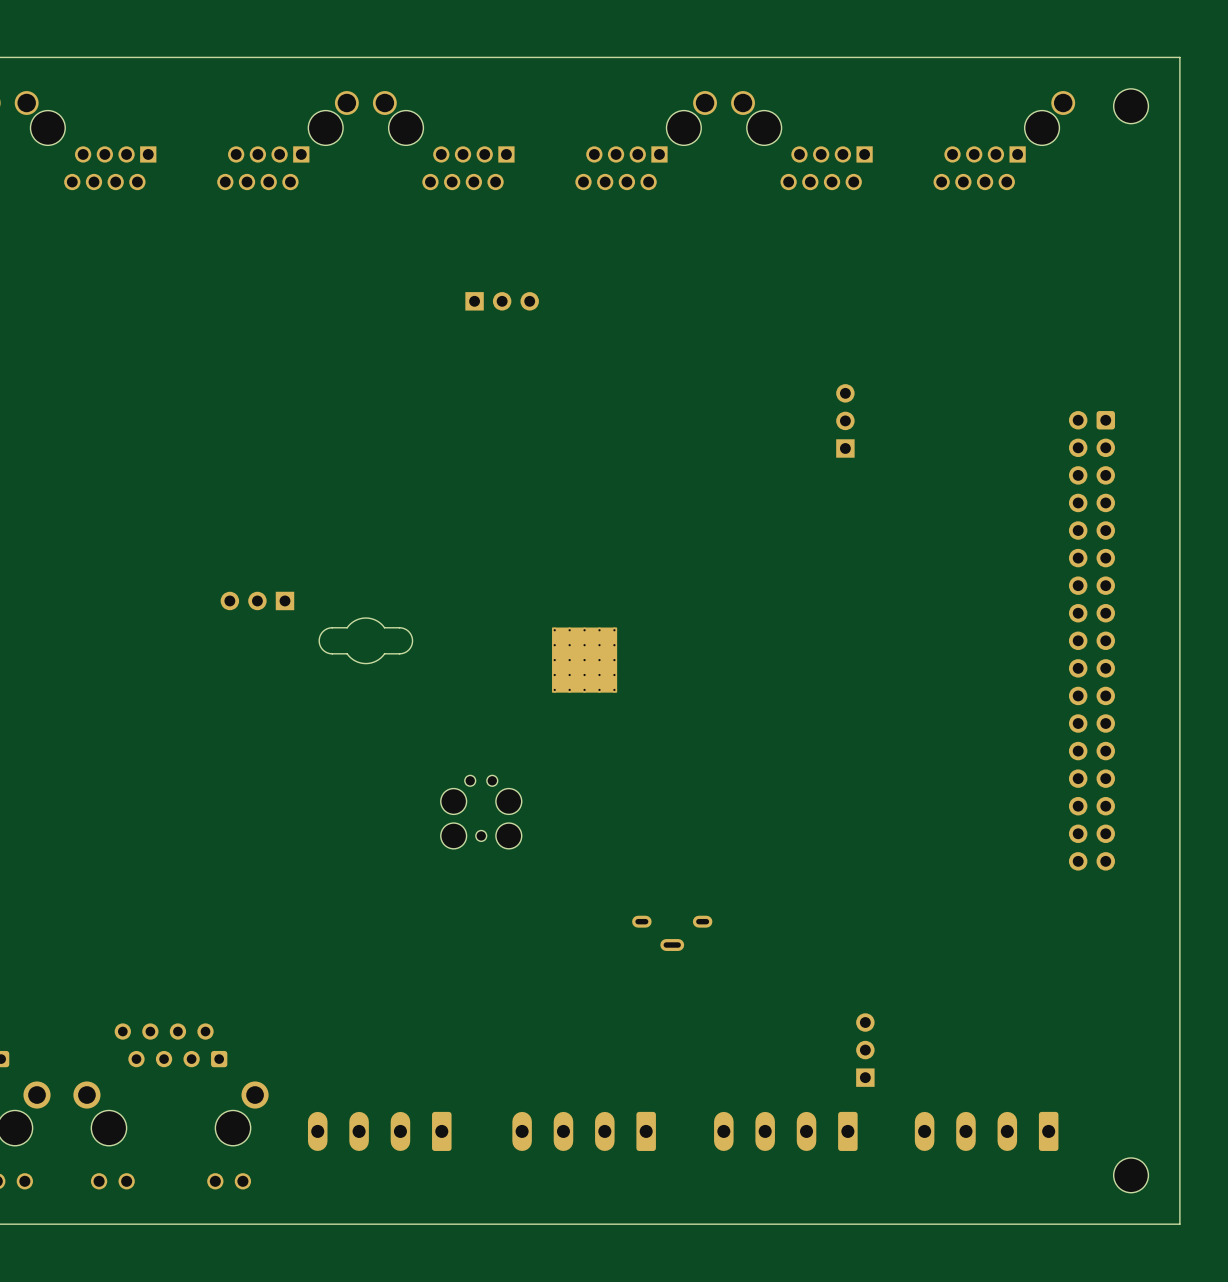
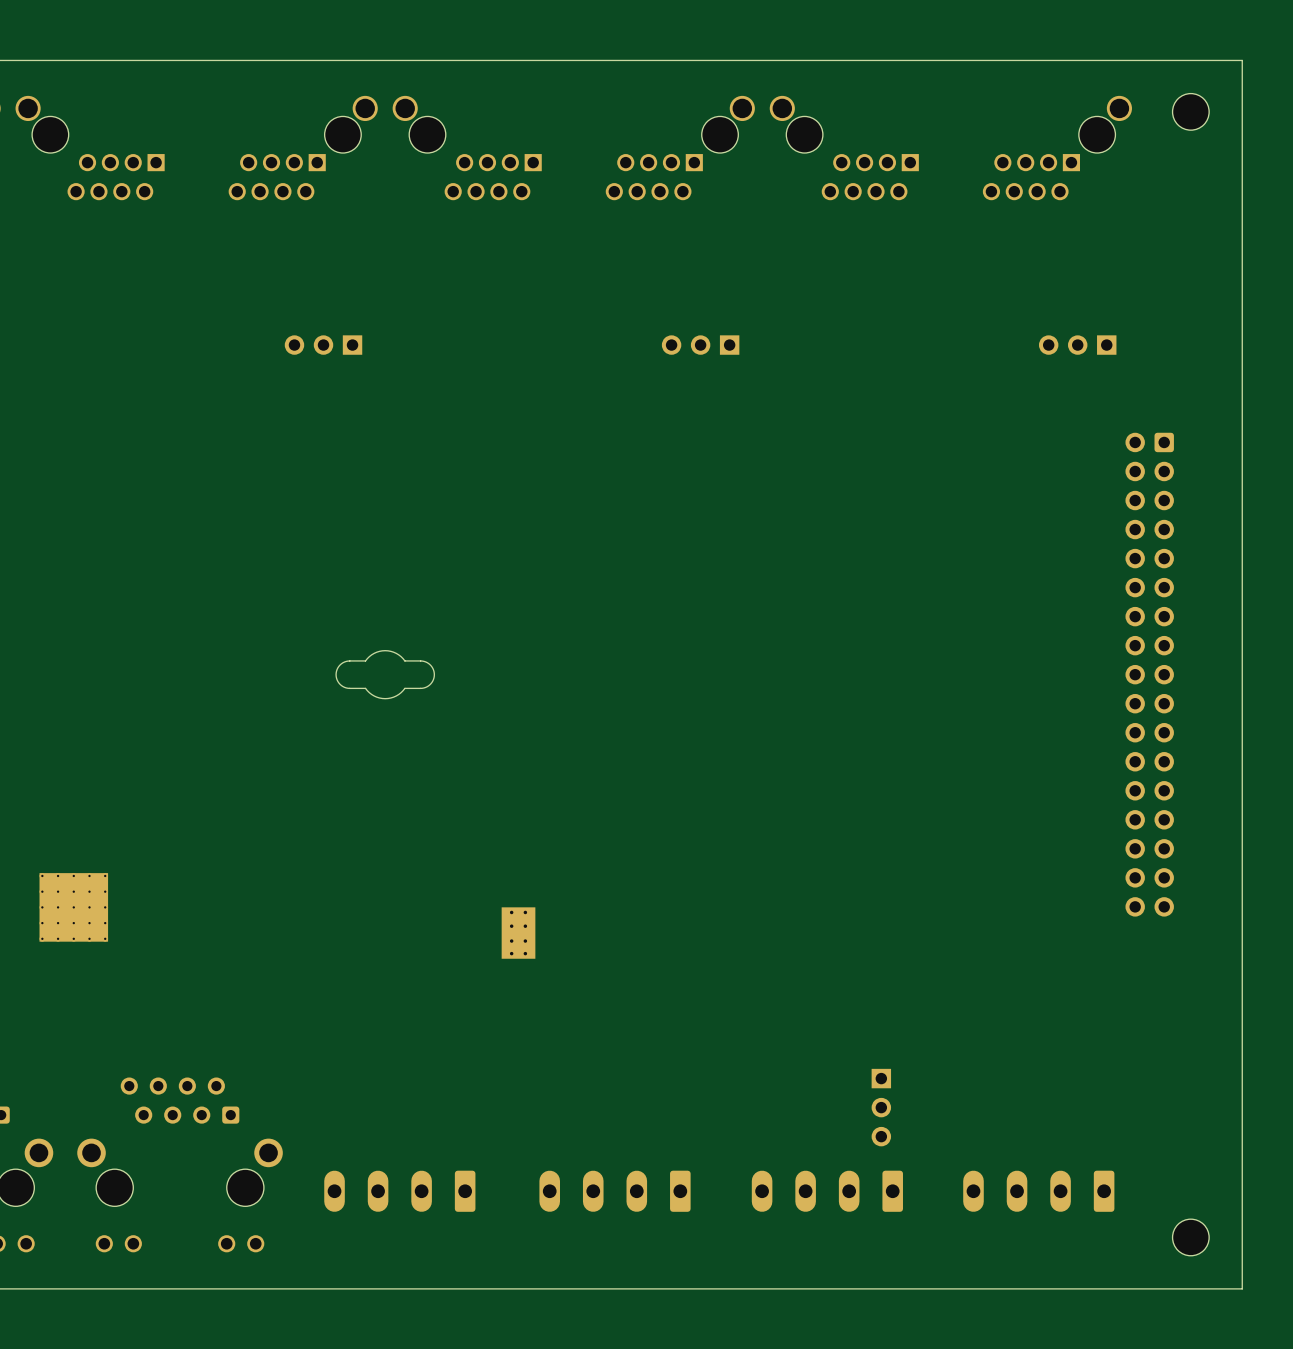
part: (502, 301) -> none
part: none -> (323, 345)
part: none -> (700, 345)
part: none -> (1077, 345)
part: (845, 420) -> none
part: (257, 600) -> none
part: (584, 660) -> none
part: (481, 812) -> none
part: none -> (73, 907)
part: none -> (518, 933)
part: (672, 933) -> none
part rotation: 0° (865, 1050) -> 180° (881, 1107)

